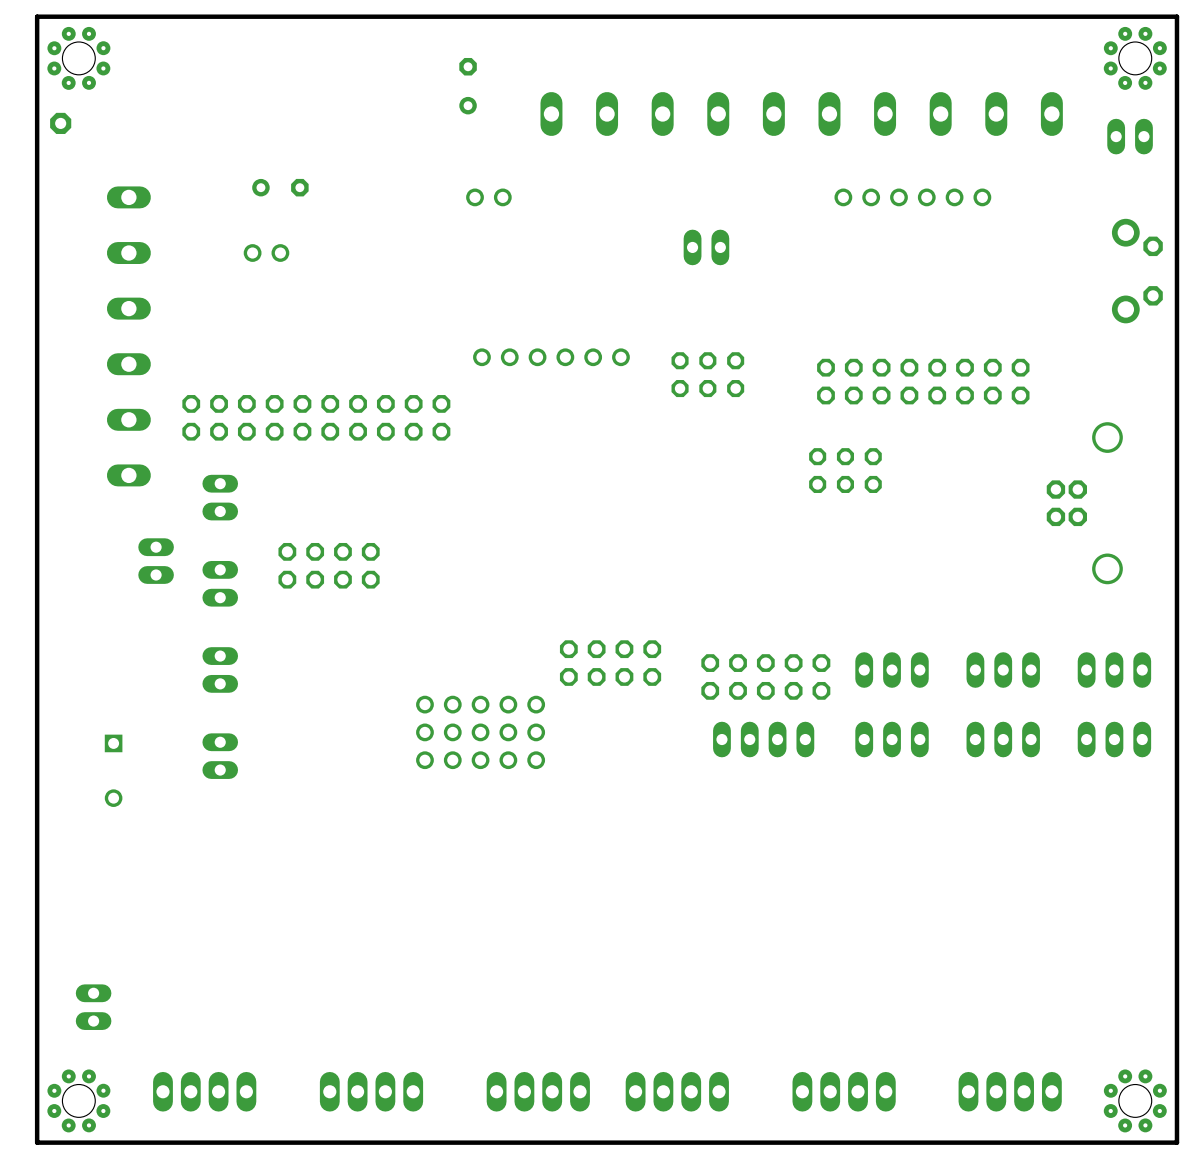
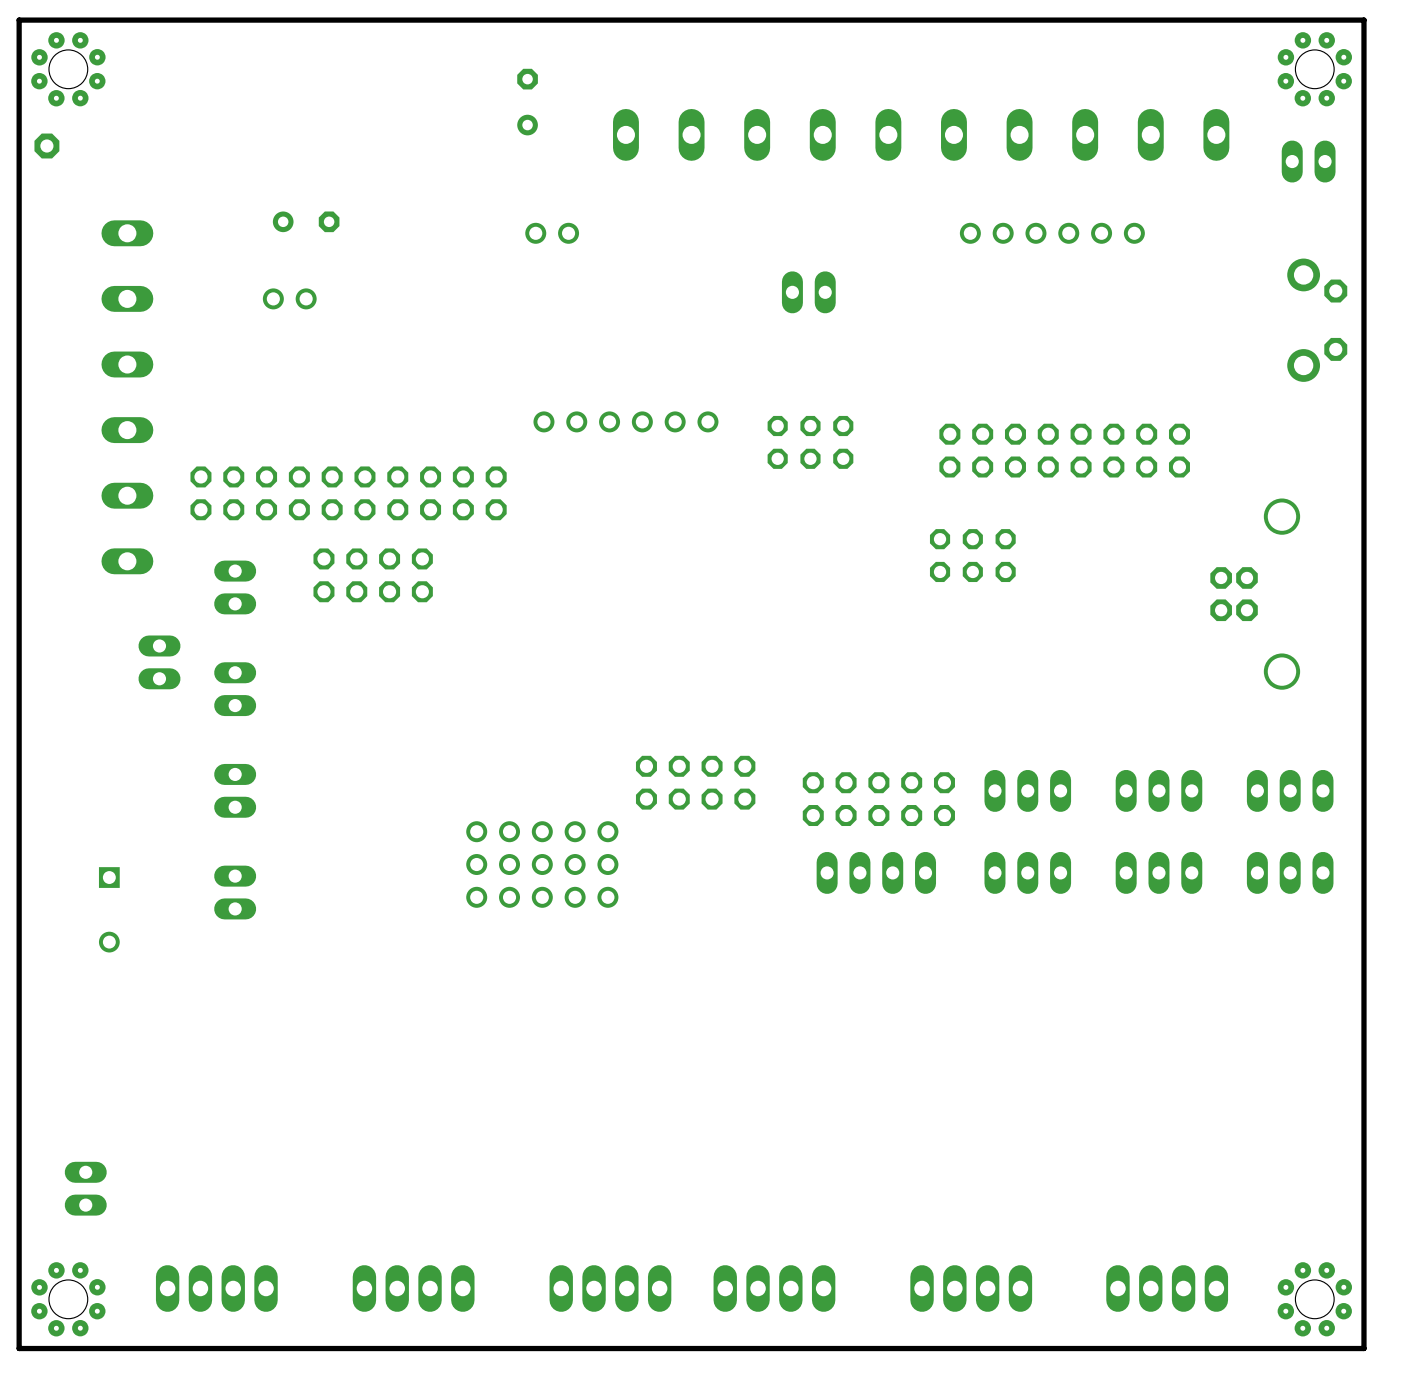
part position: (329, 565) -> (373, 575)

